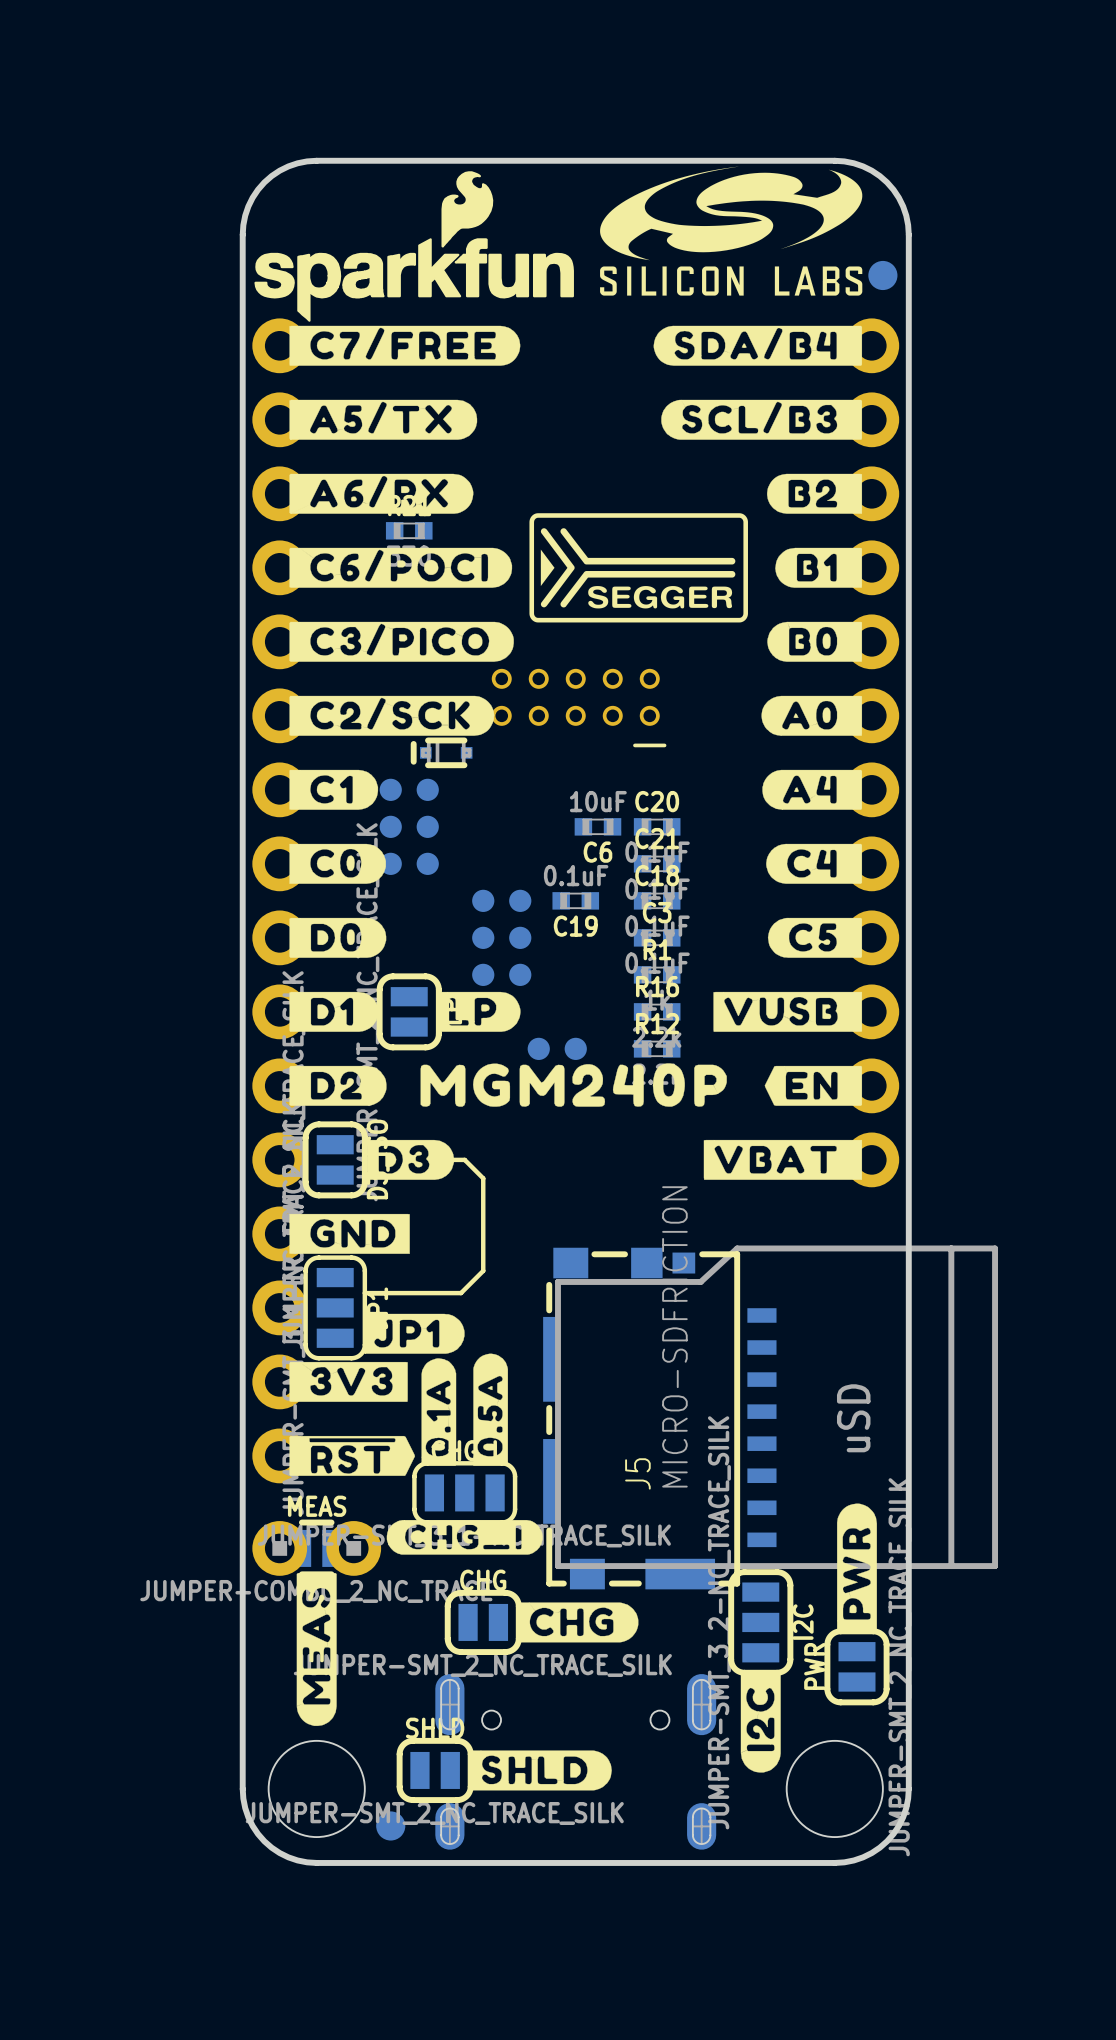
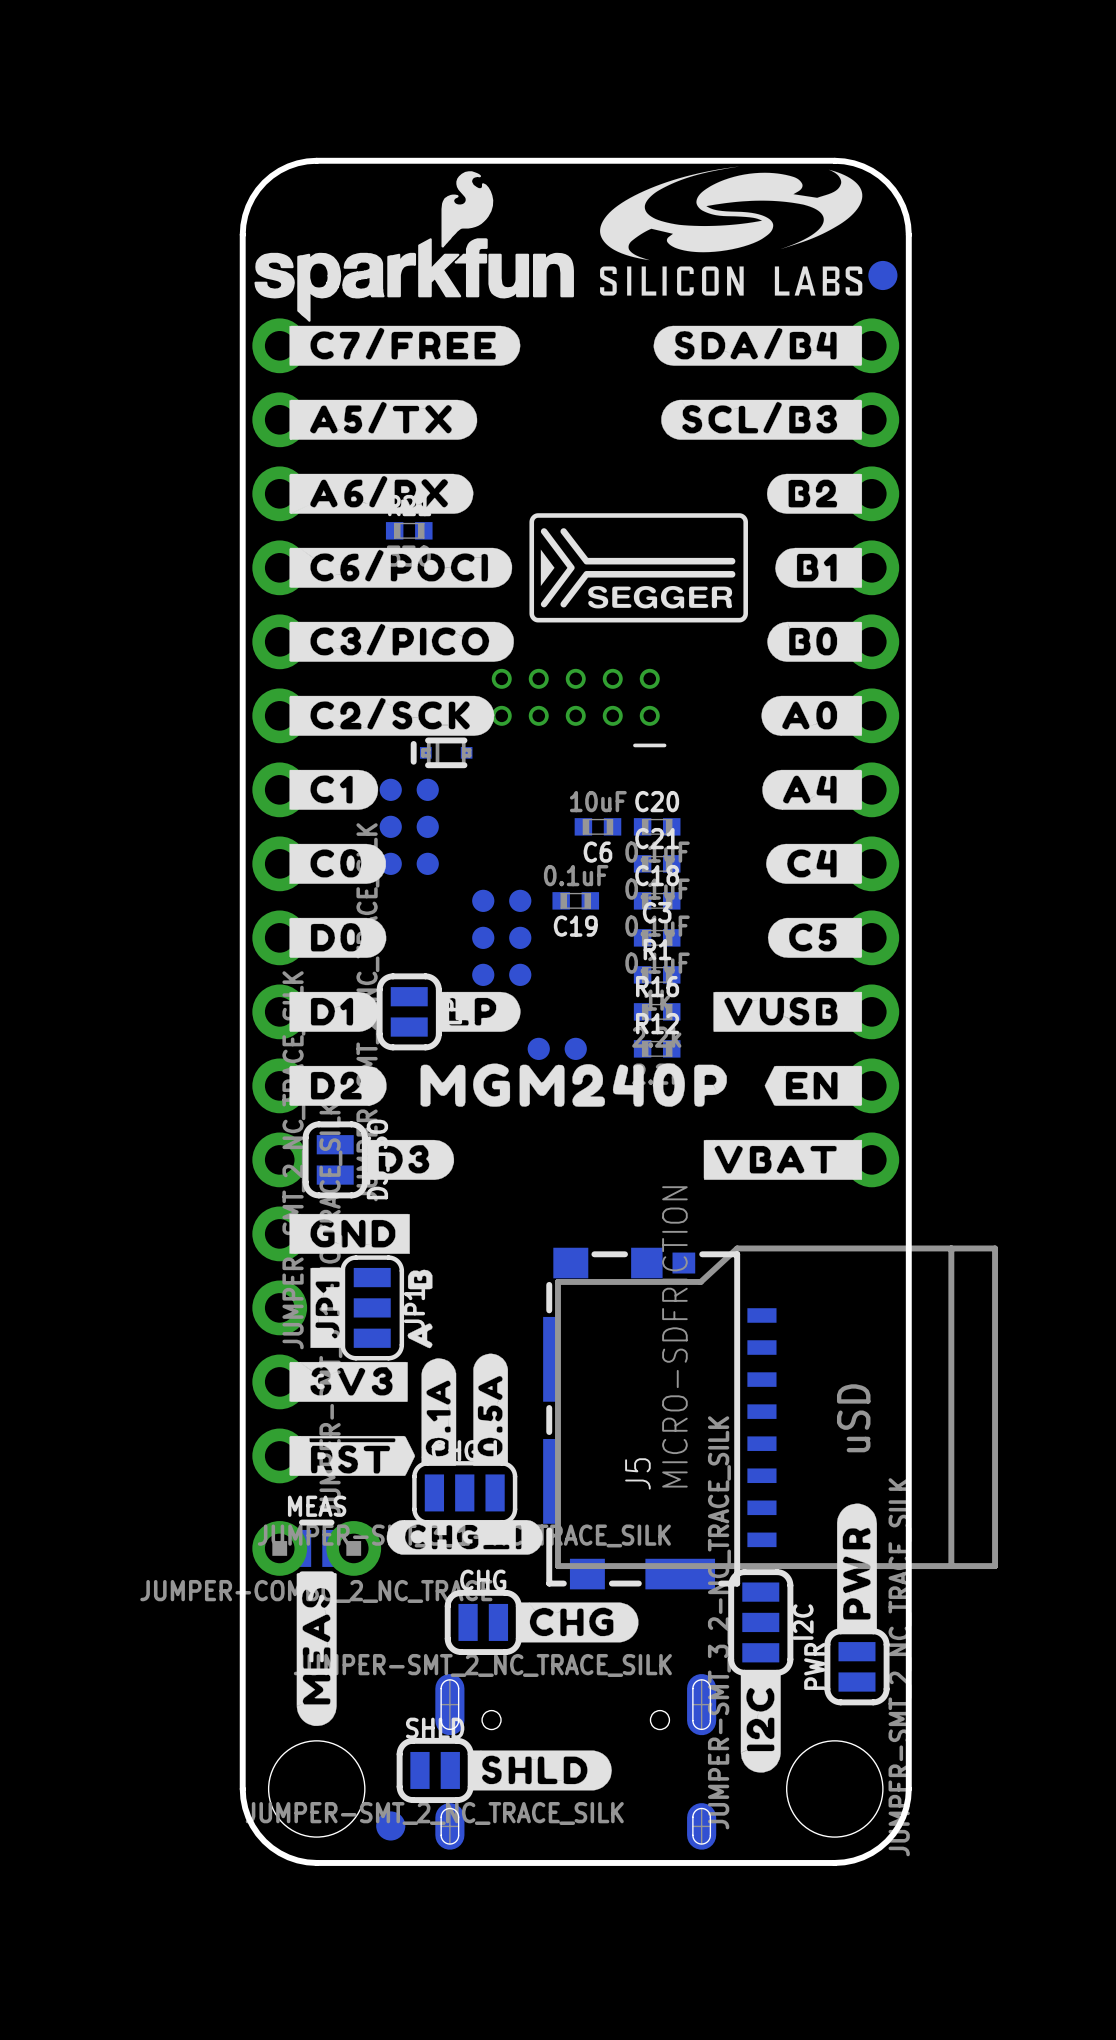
line: (446, 1159) (464, 1159) (483, 1178) (483, 1270) (461, 1293) (364, 1293) -> none
drawing: none -> [310, 1267, 346, 1348]
drawing: none -> [407, 1269, 433, 1290]
JP1 position: (335, 1307) -> (372, 1307)
drawing shape: [363, 1313, 465, 1354] -> [407, 1323, 433, 1349]

